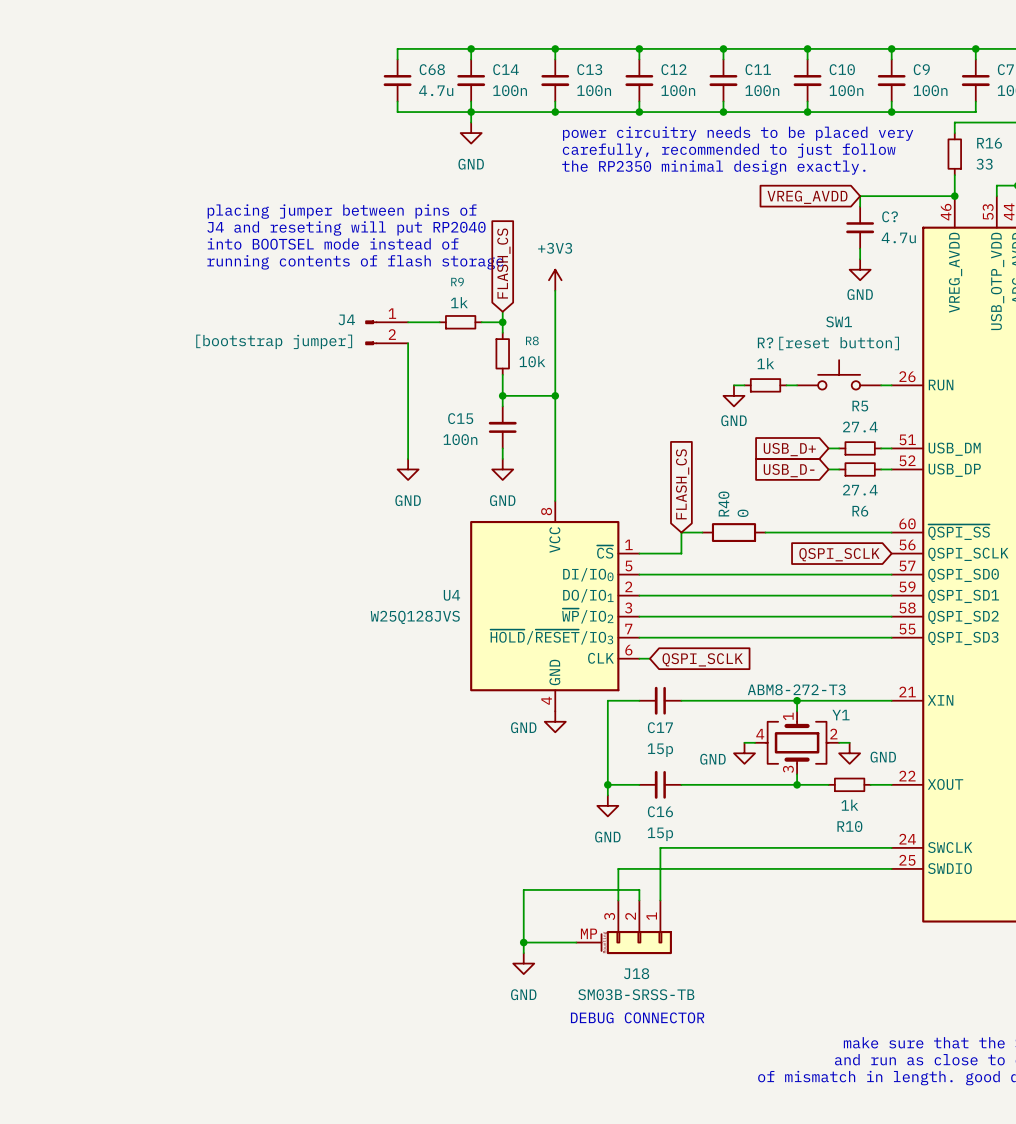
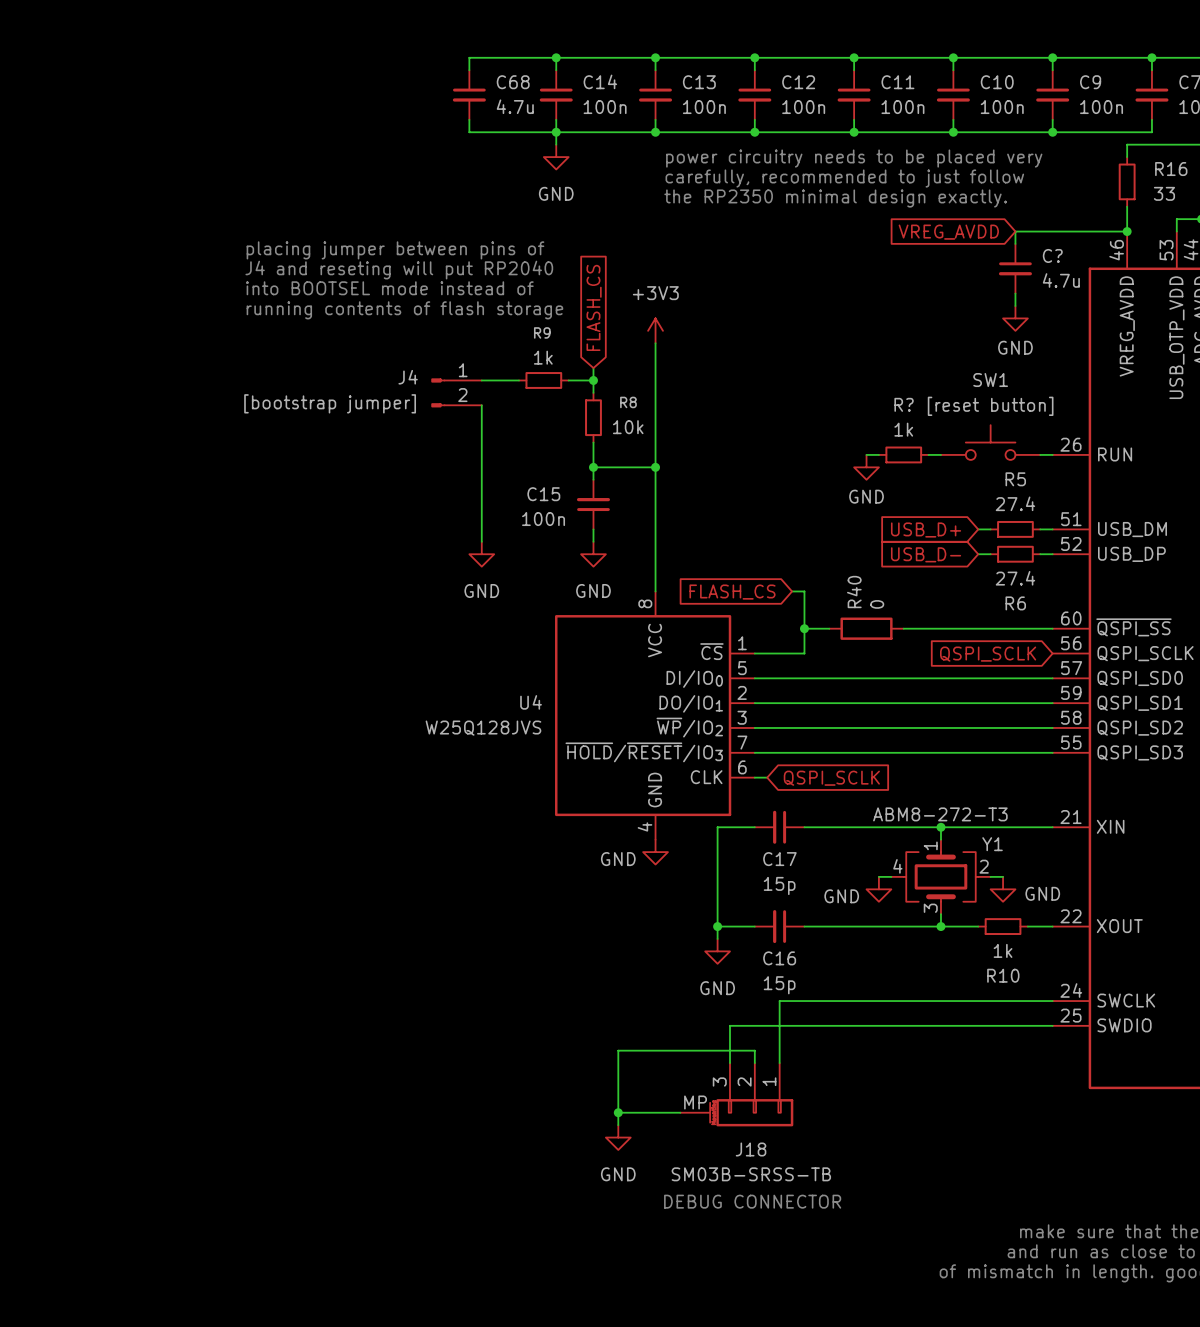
global label rotation: 0° (682, 484) -> 90° counterclockwise (732, 592)
wire: none -> (792, 591) (804, 591) (804, 628)
junction: none -> (804, 628)

